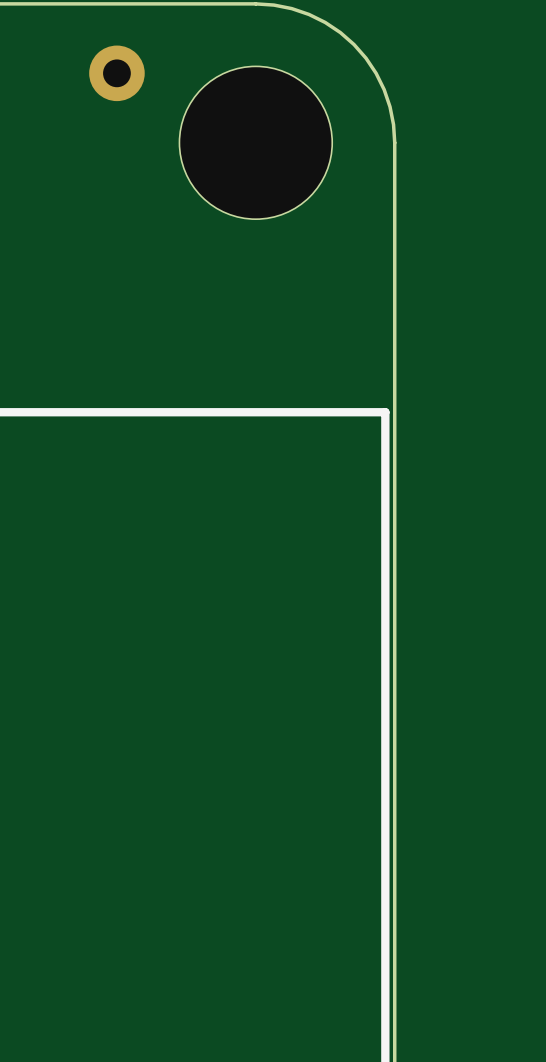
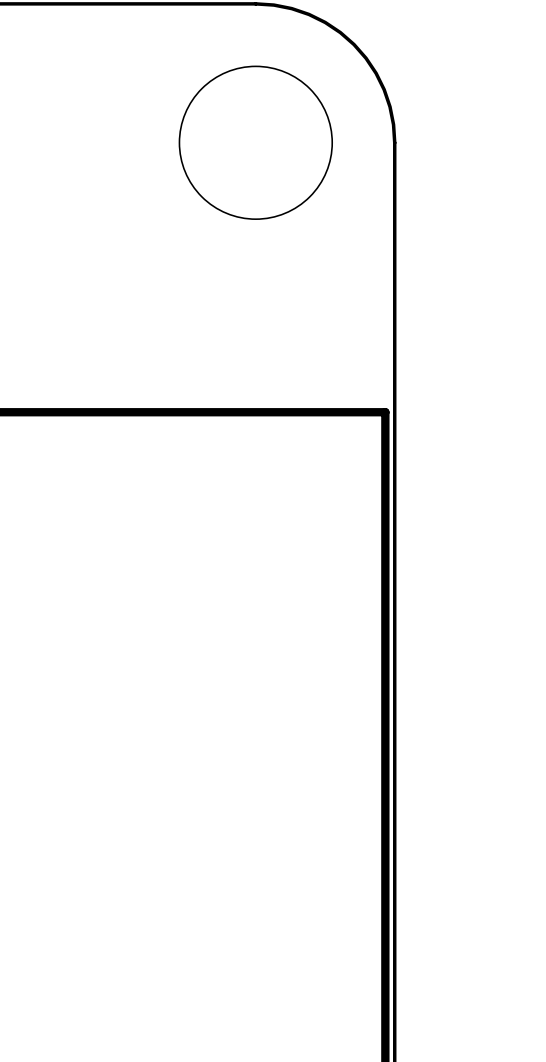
via: (116, 73) -> none

